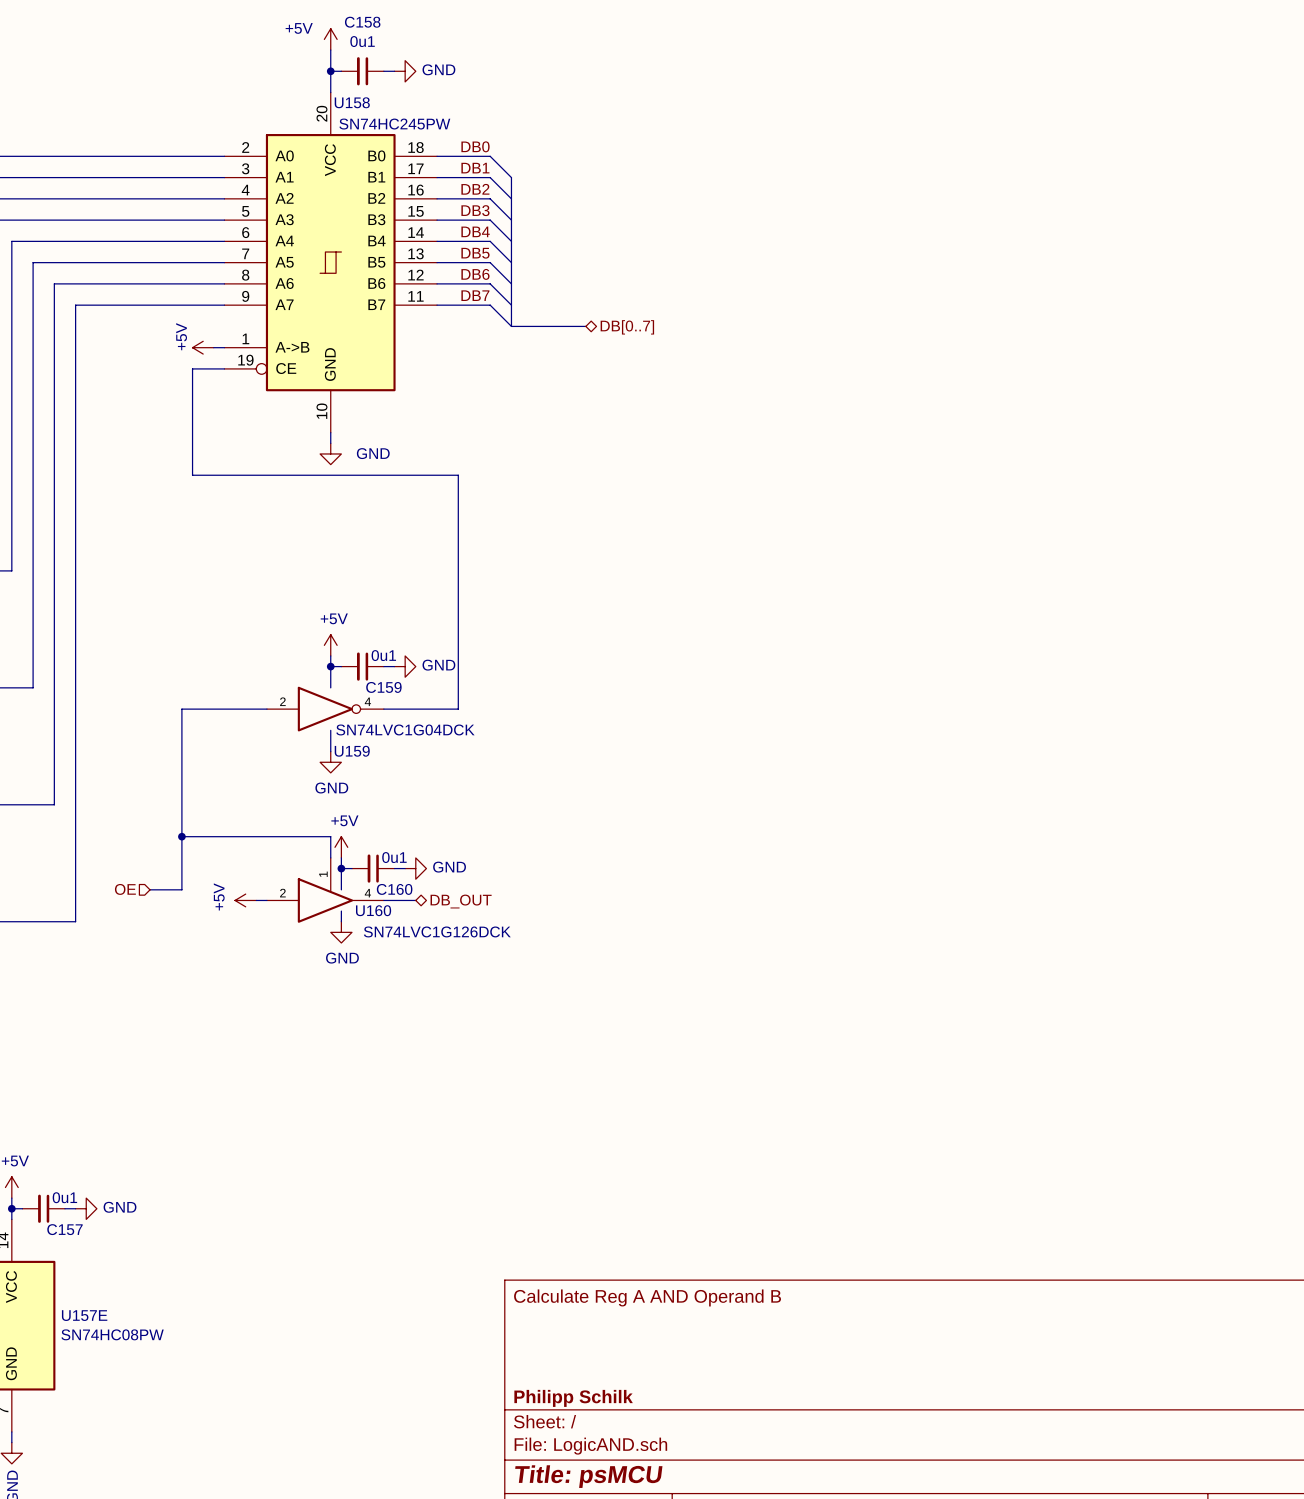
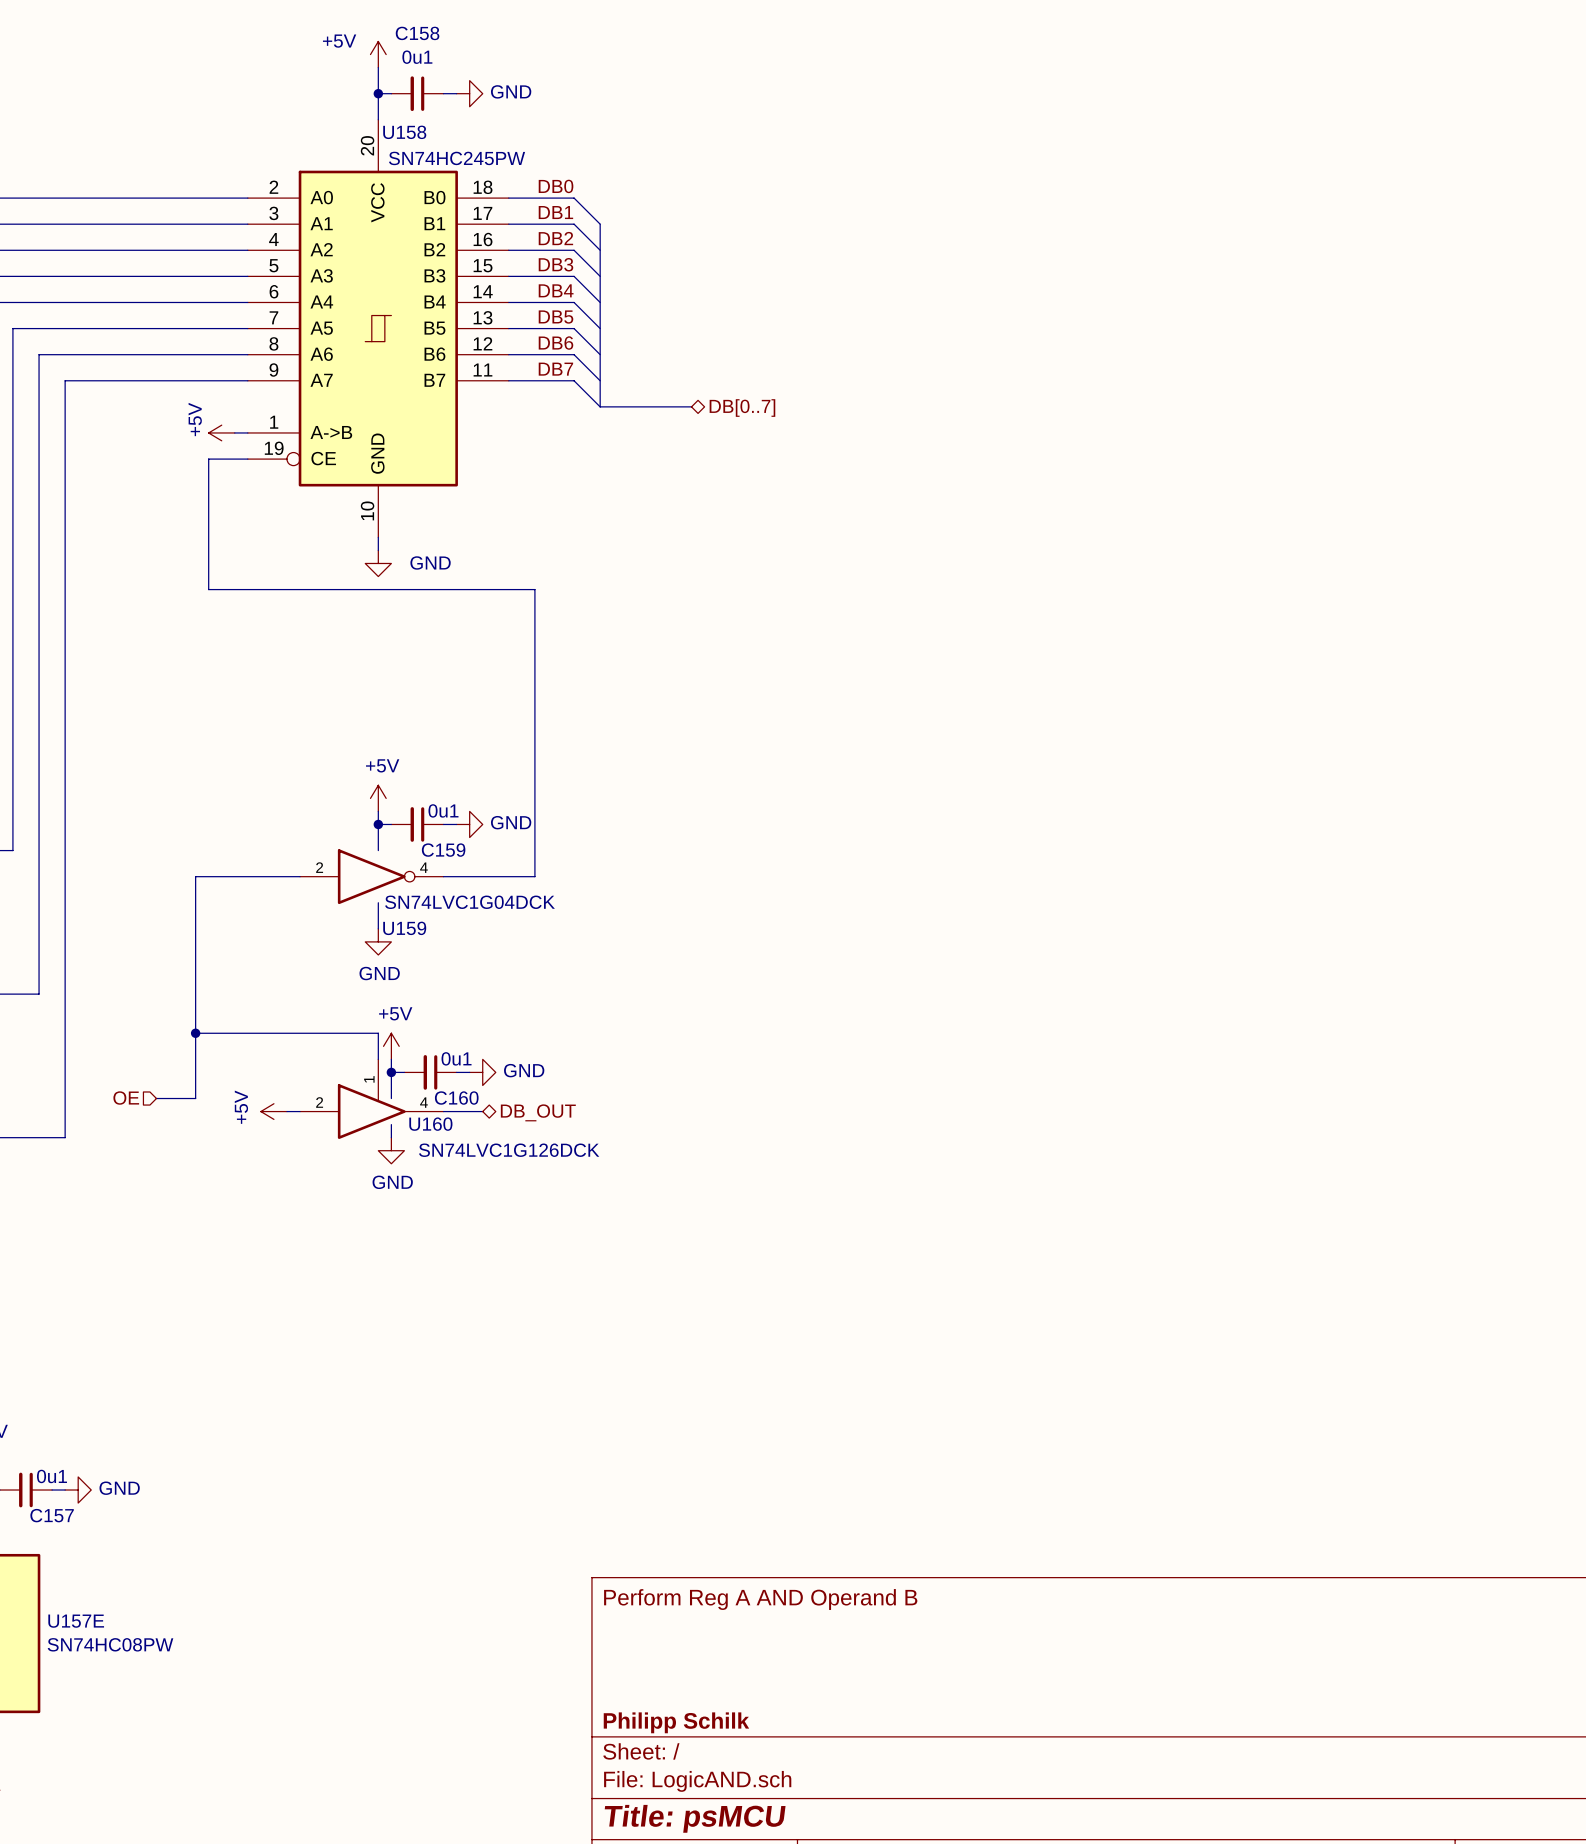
title block: Calculate Reg A AND Operand B (647, 1297) -> Perform Reg A AND Operand B (760, 1599)

